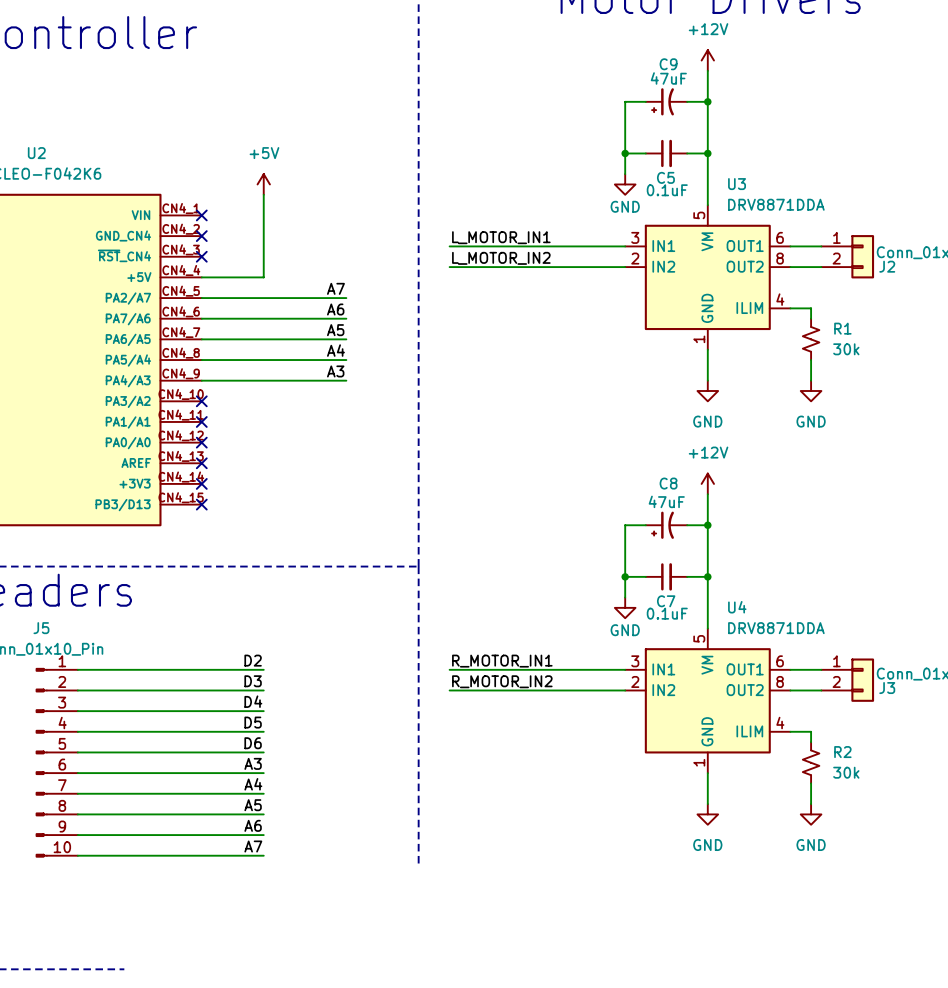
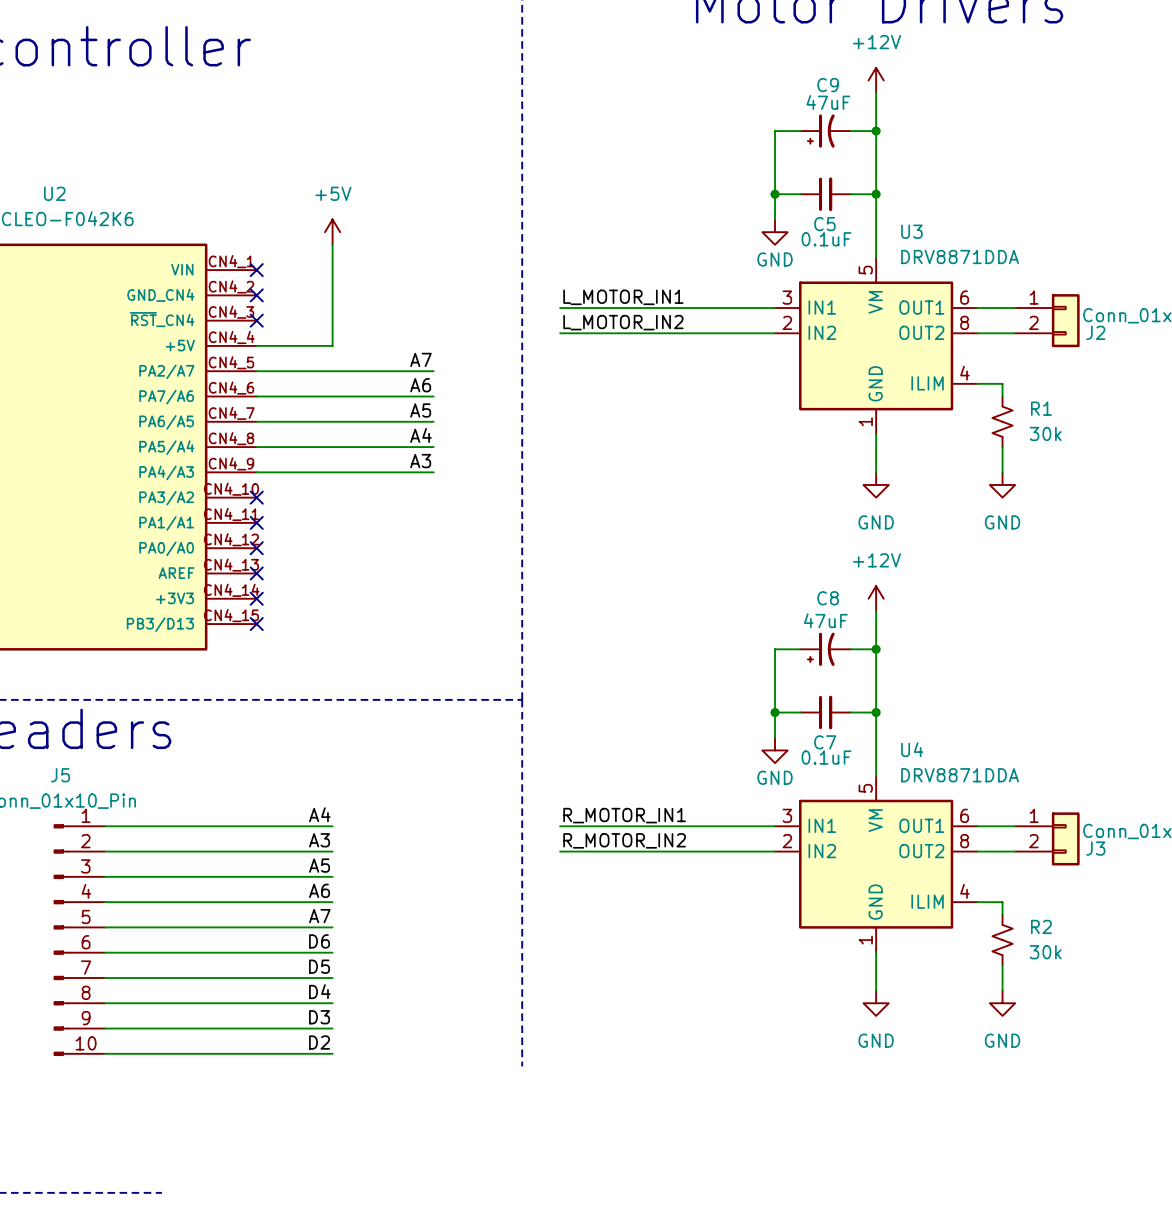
label: D2 (253, 660) -> A4 (319, 814)
label: D3 (253, 681) -> A3 (319, 840)
label: D4 (253, 701) -> A5 (319, 865)
label: D5 (253, 722) -> A6 (319, 890)
label: D6 (253, 743) -> A7 (319, 916)
label: A3 (253, 763) -> D6 (319, 941)
label: A4 (253, 784) -> D5 (319, 966)
label: A5 (253, 805) -> D4 (319, 991)
label: A6 (253, 825) -> D3 (319, 1017)
label: A7 (253, 846) -> D2 (319, 1042)

